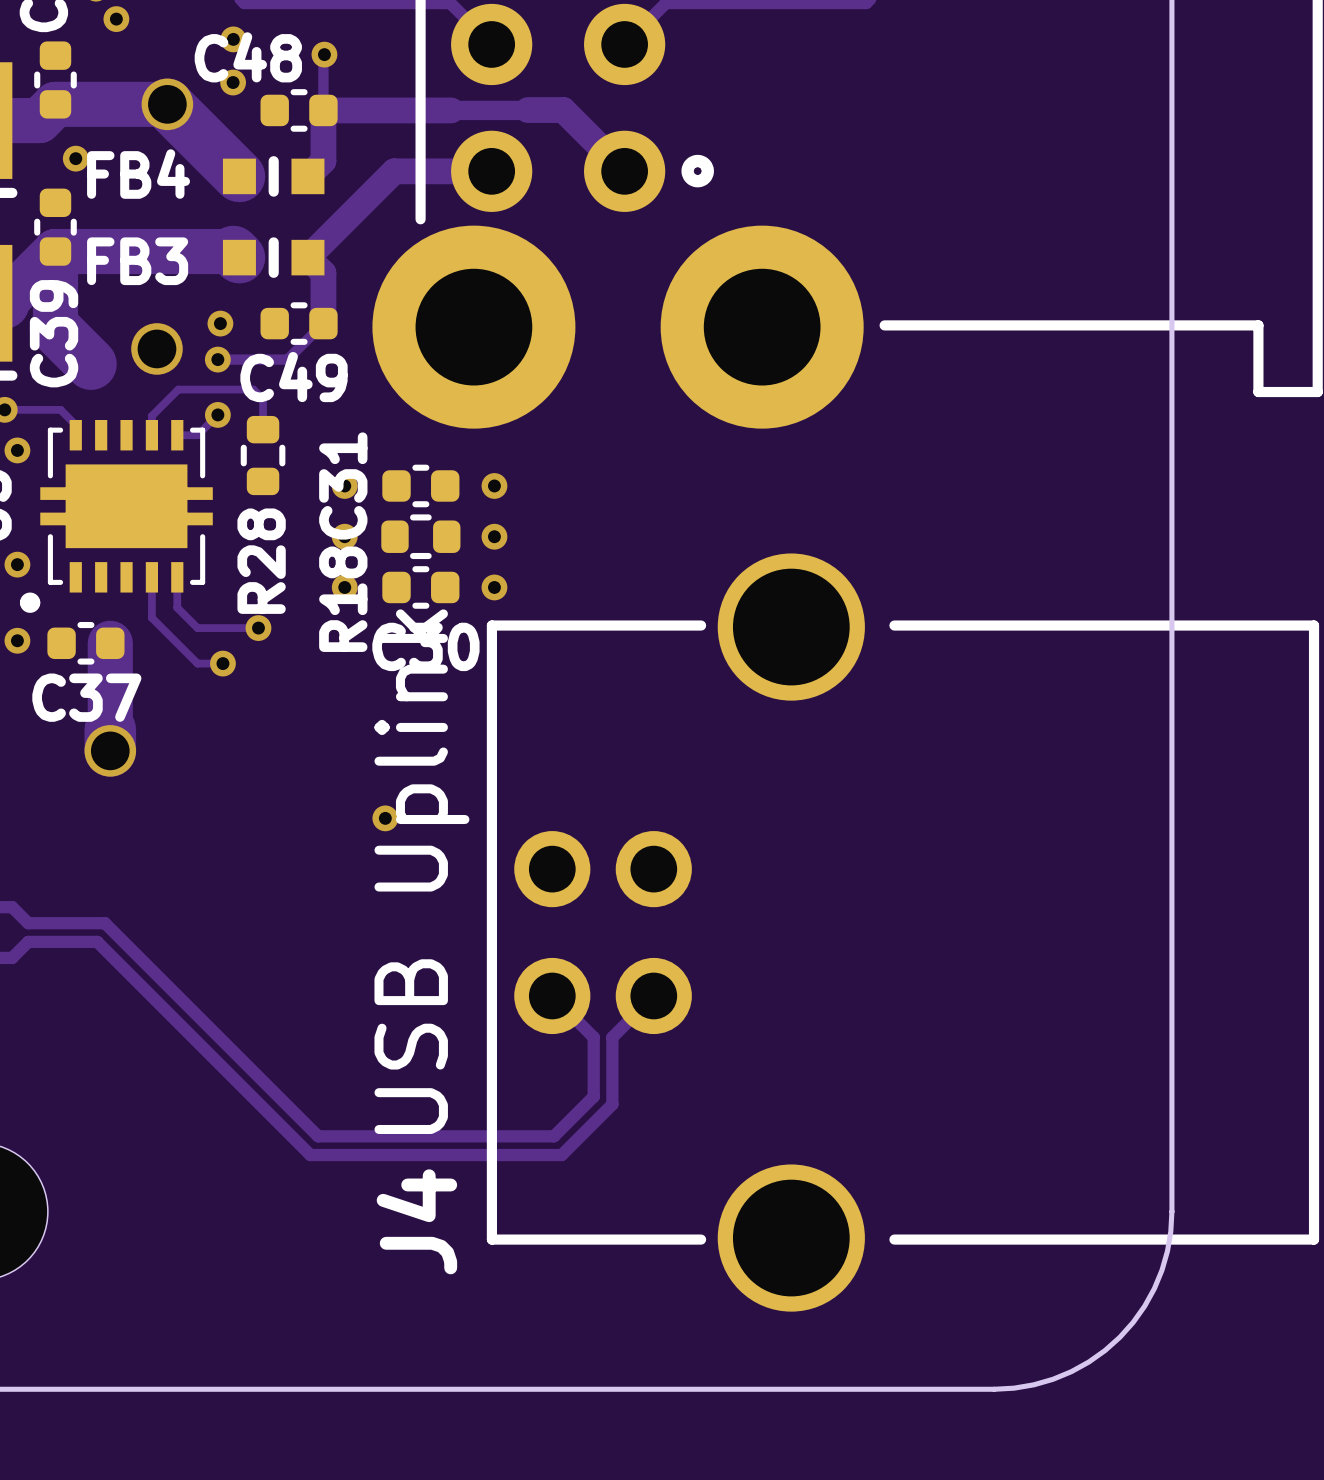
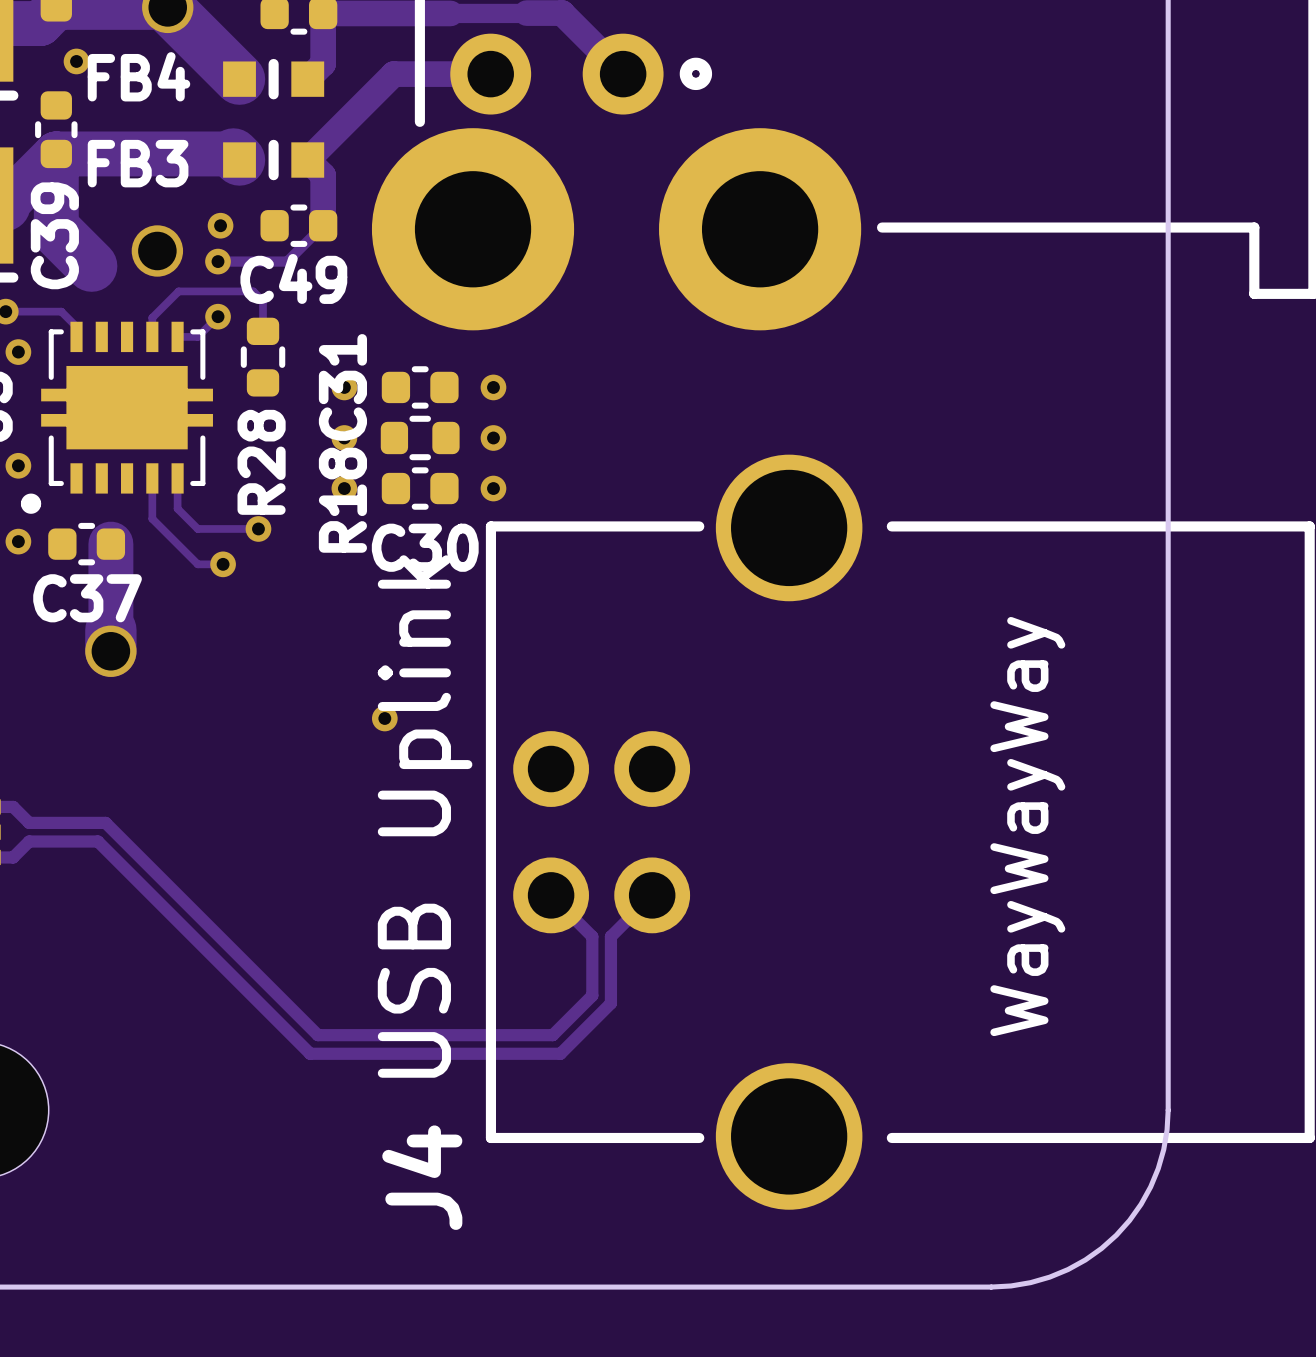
text position: USB Uplink (421, 871) -> USB Uplink (425, 816)
text: none -> WayWayWay (1027, 826)
J4 name position: J4 (416, 1221) -> J4 (422, 1177)

